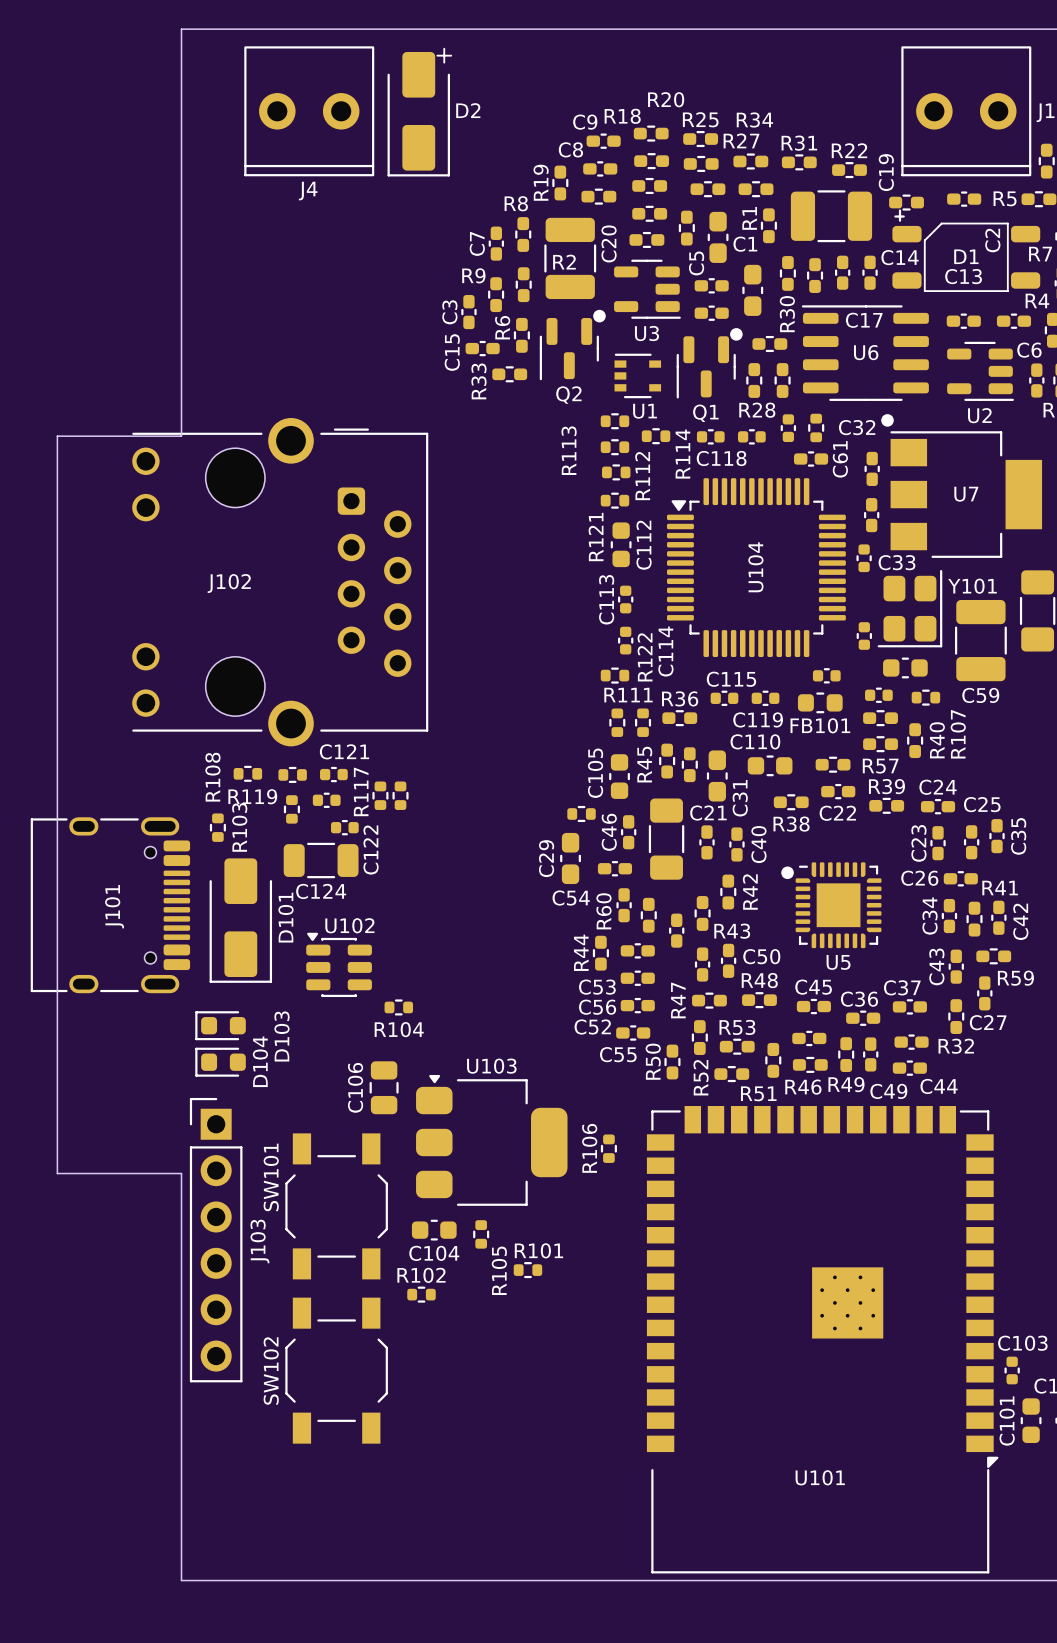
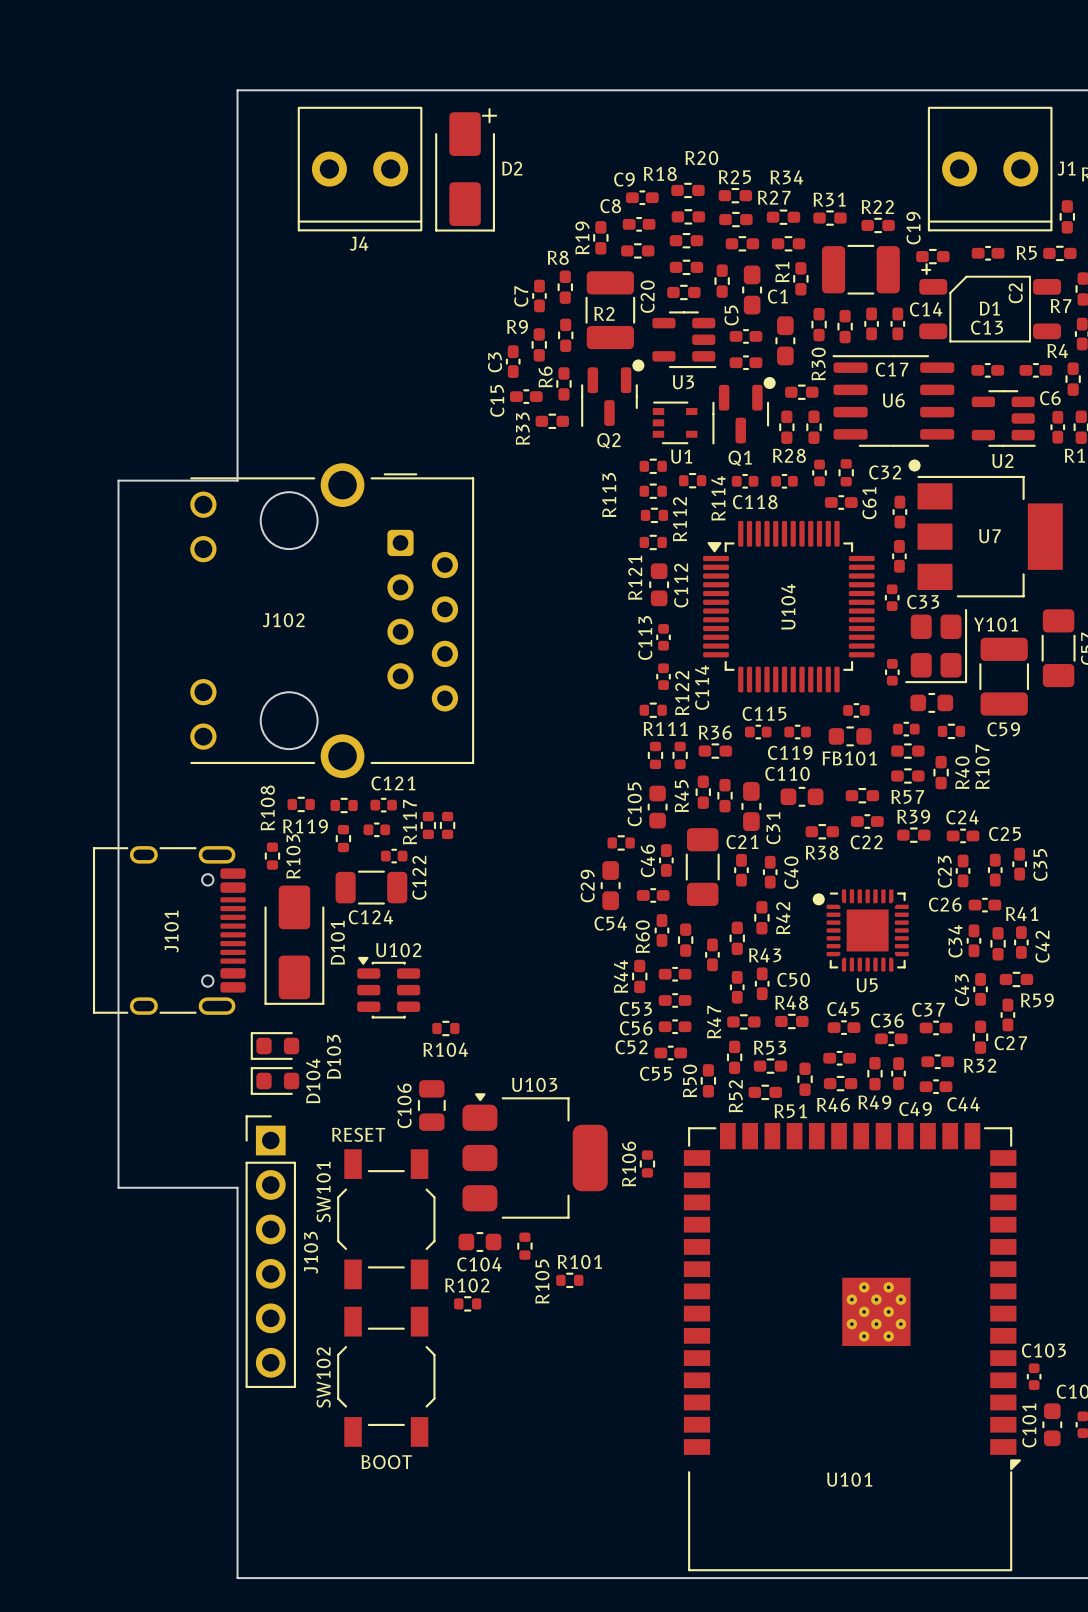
text: none -> RESET (358, 1134)
text: none -> BOOT (386, 1462)

